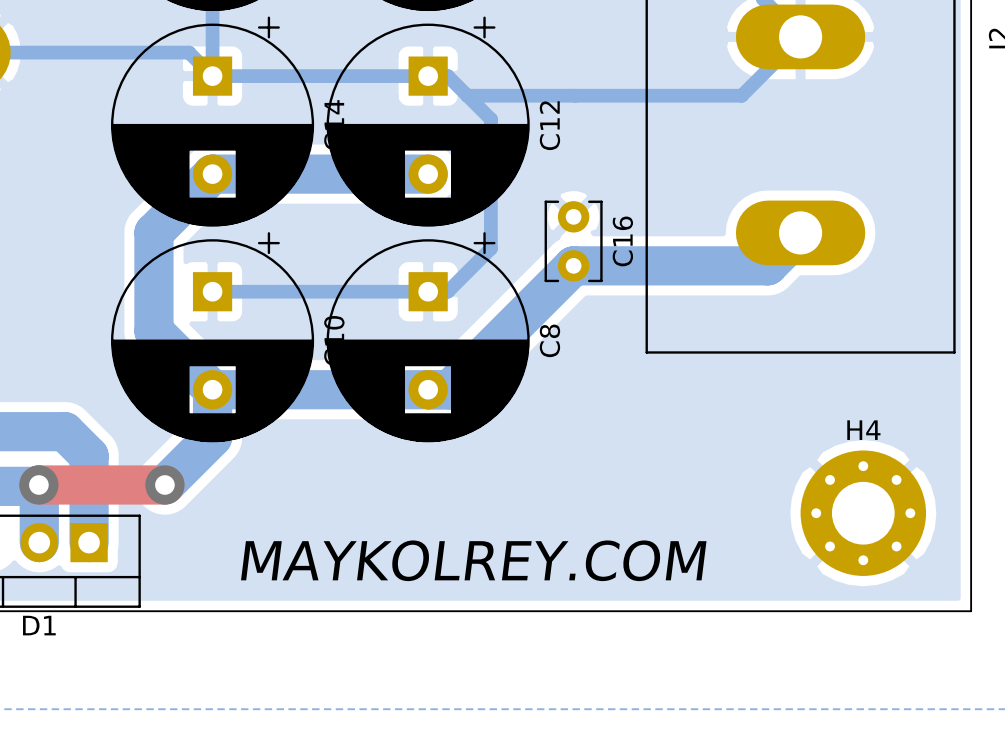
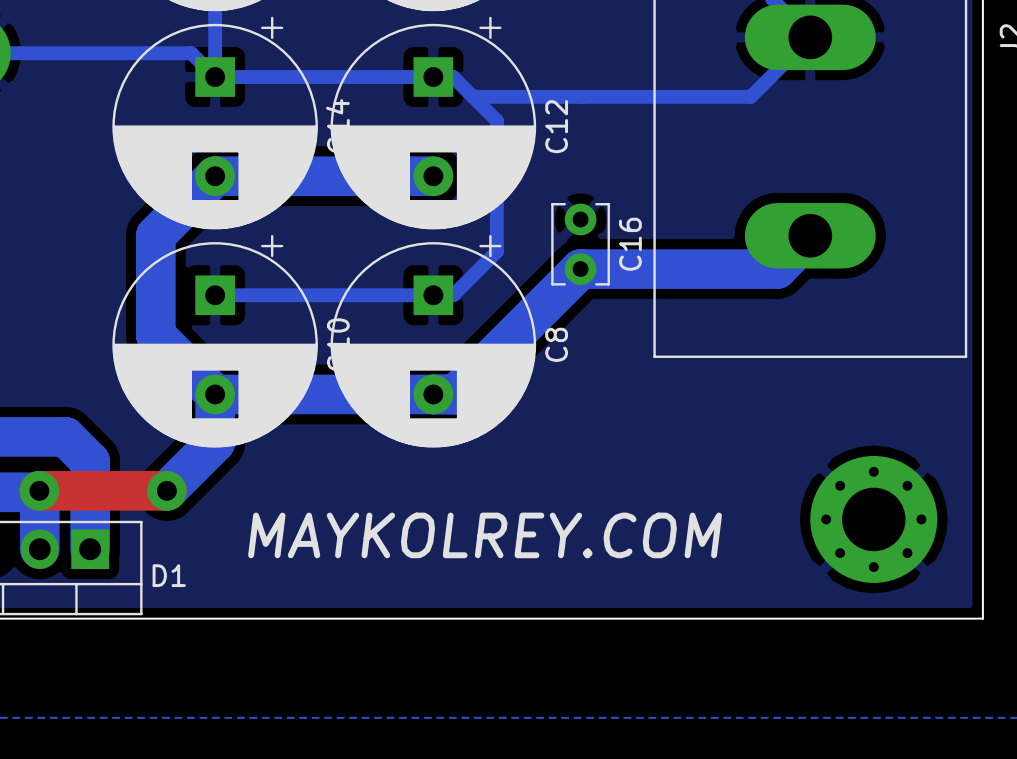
H4 name: H4 (863, 430) -> none
text position: MAYKOLREY.COM (473, 560) -> MAYKOLREY.COM (485, 535)
D1 name position: D1 (39, 625) -> D1 (169, 575)

